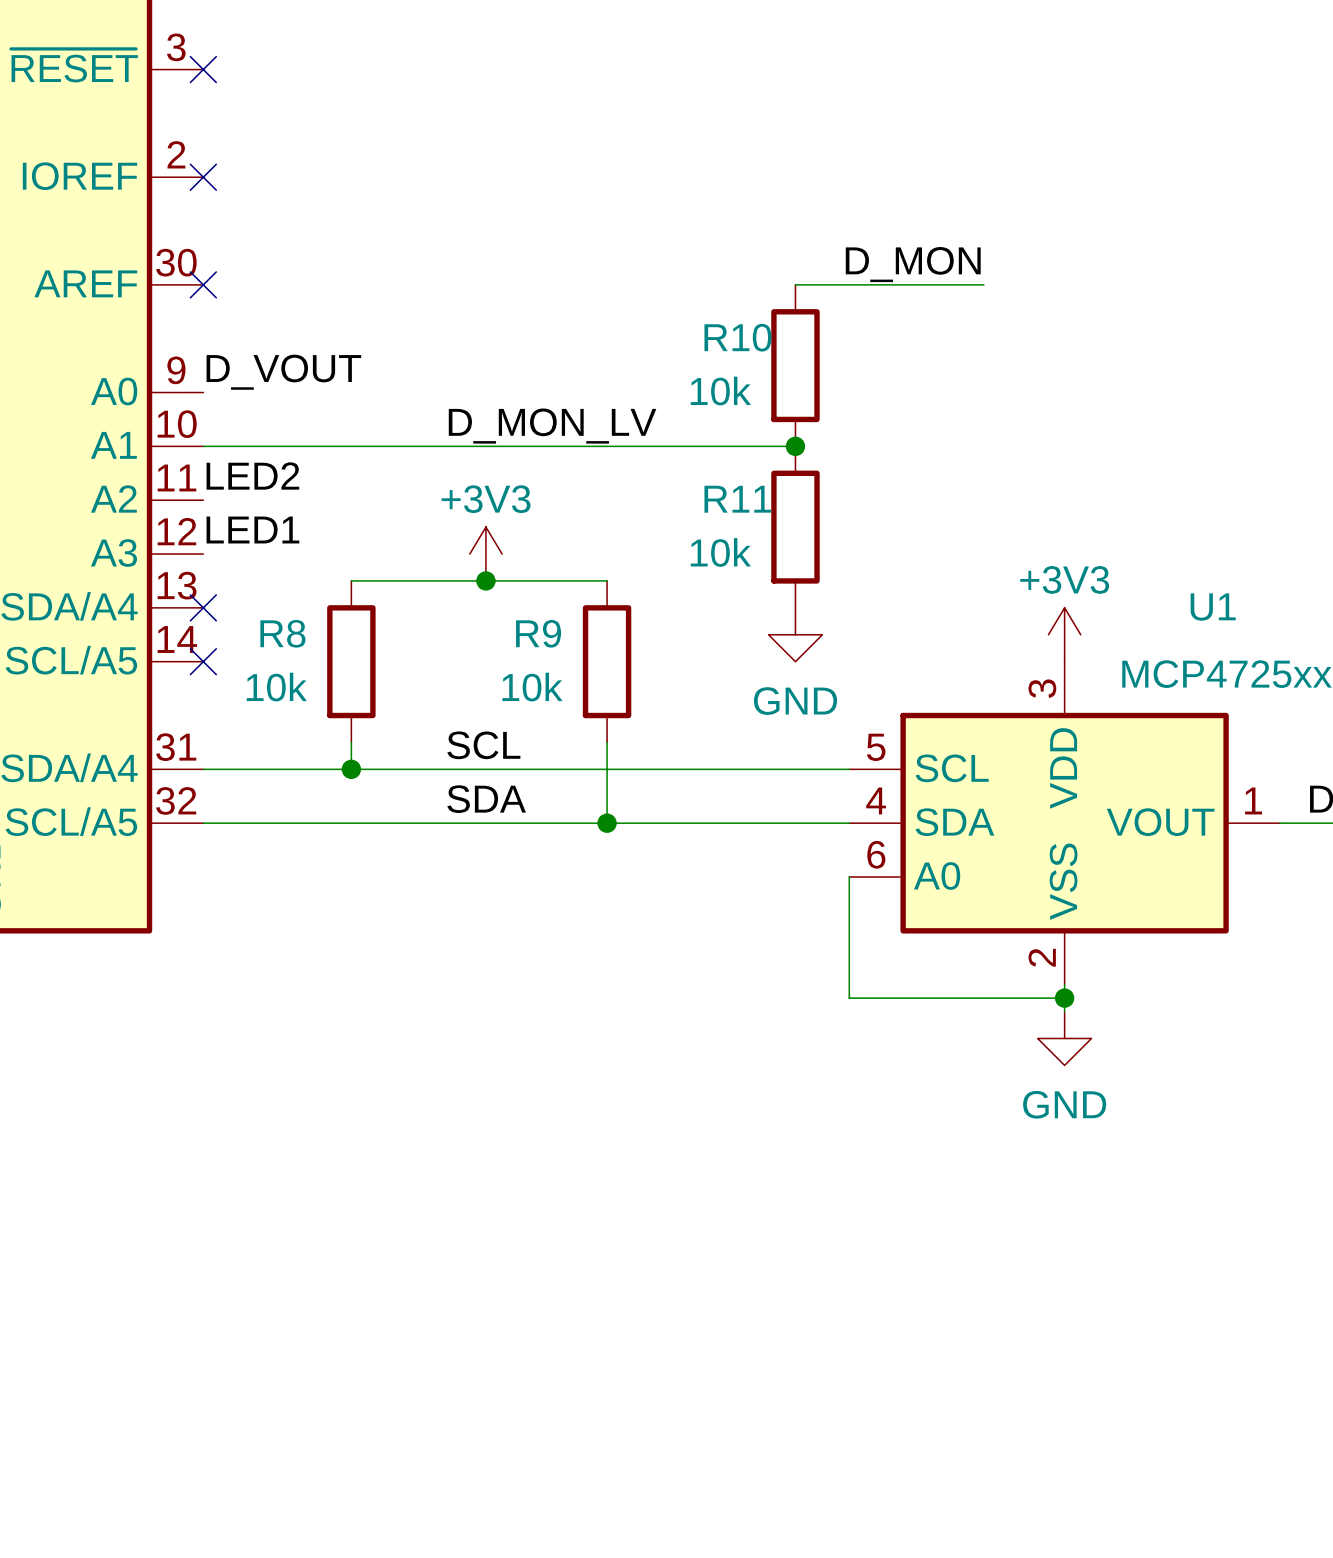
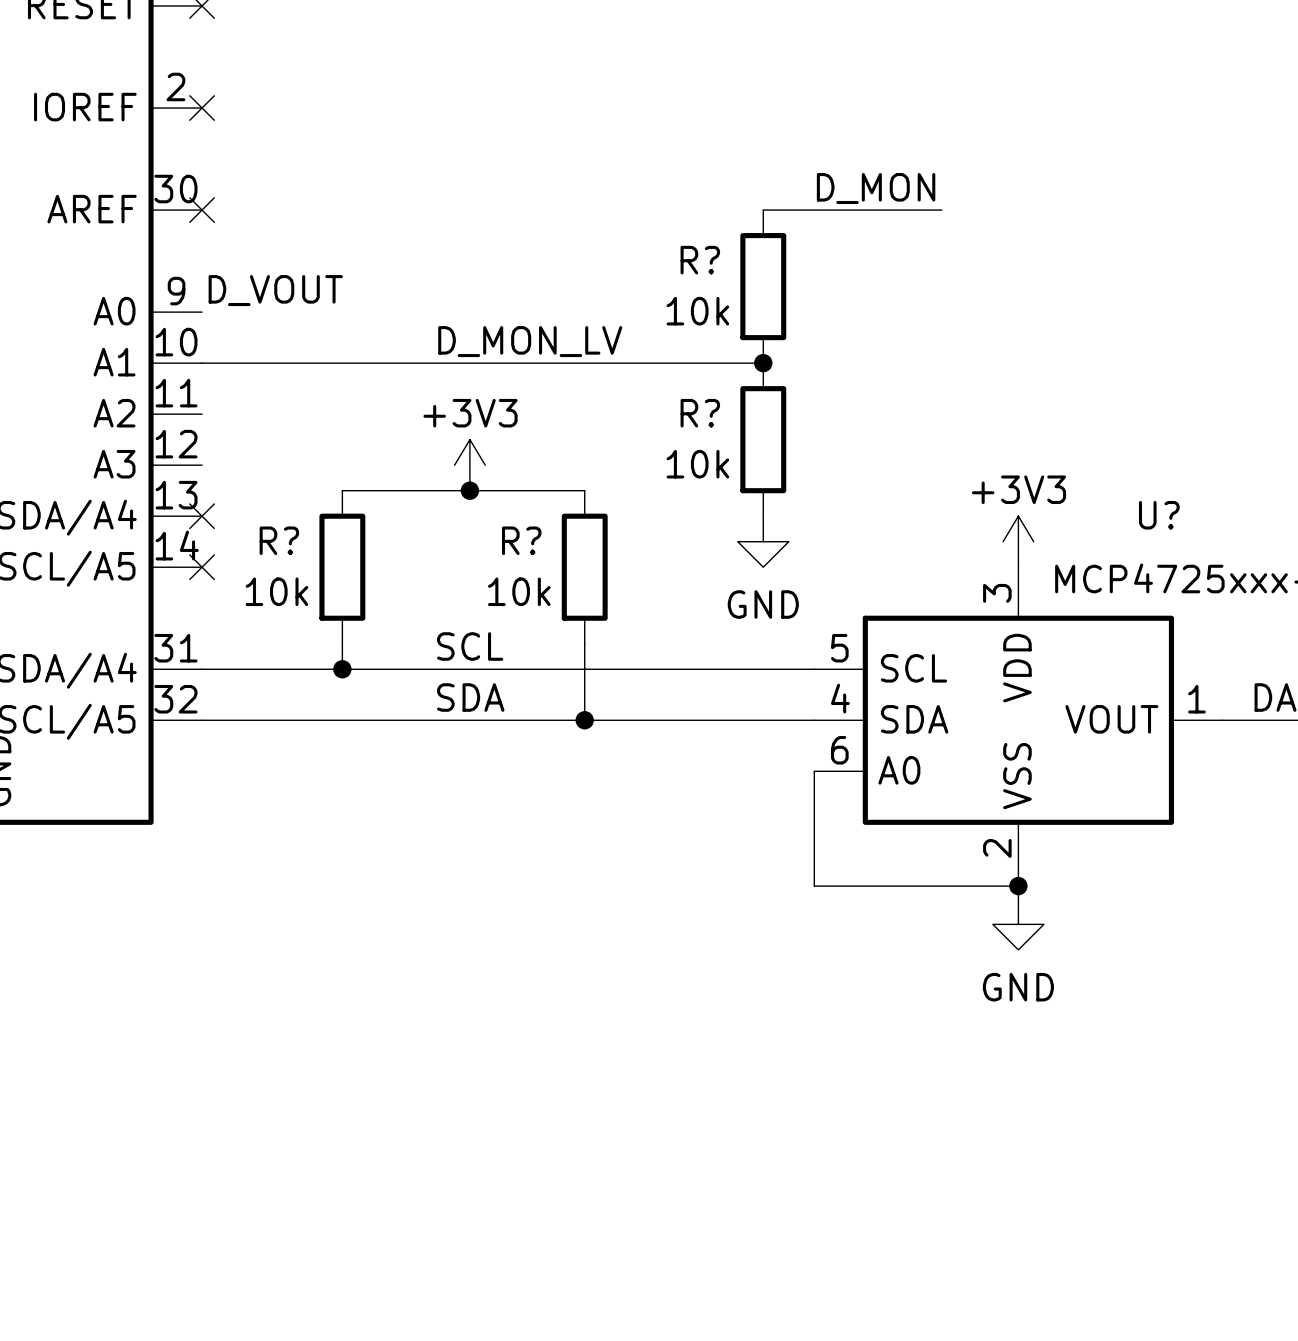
R10 name: R10 (737, 337) -> R? (700, 260)
label: LED2 (252, 475) -> none
R11 name: R11 (737, 499) -> R? (700, 413)
label: LED1 (252, 530) -> none
U1 name: U1 (1213, 607) -> U? (1159, 515)
R8 name: R8 (282, 633) -> R? (279, 540)
R9 name: R9 (538, 633) -> R? (521, 540)

